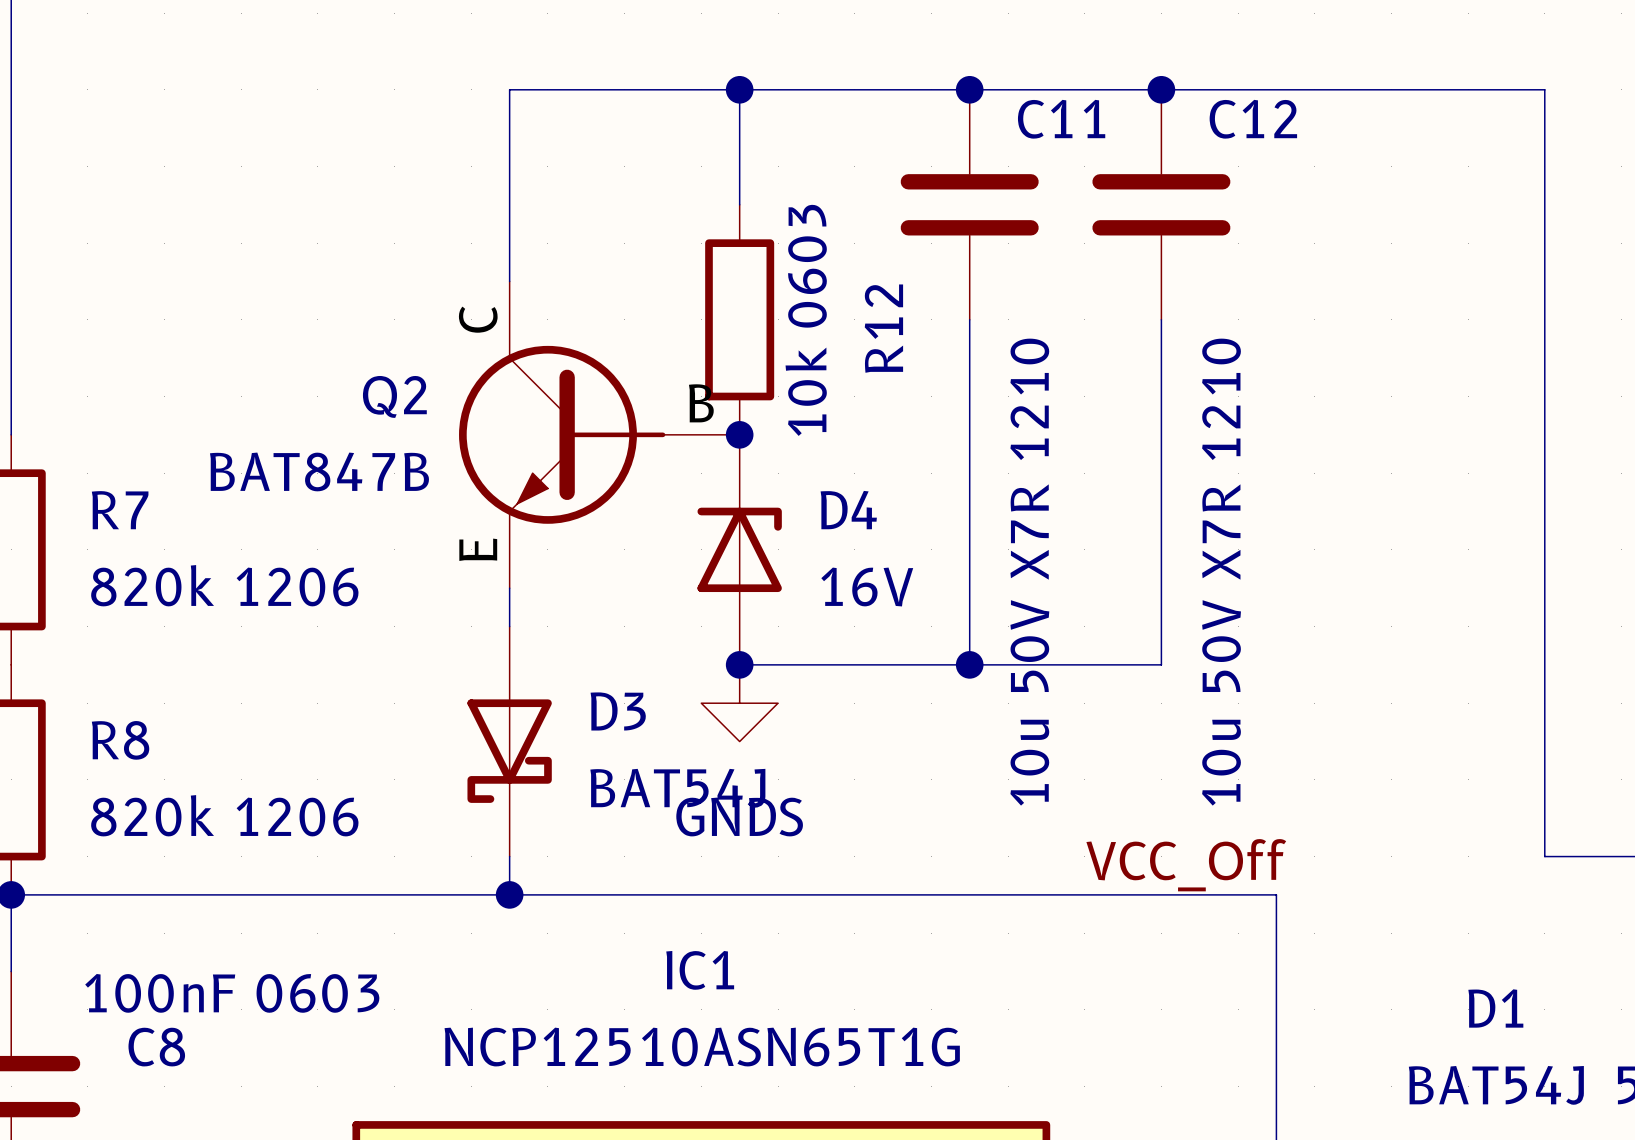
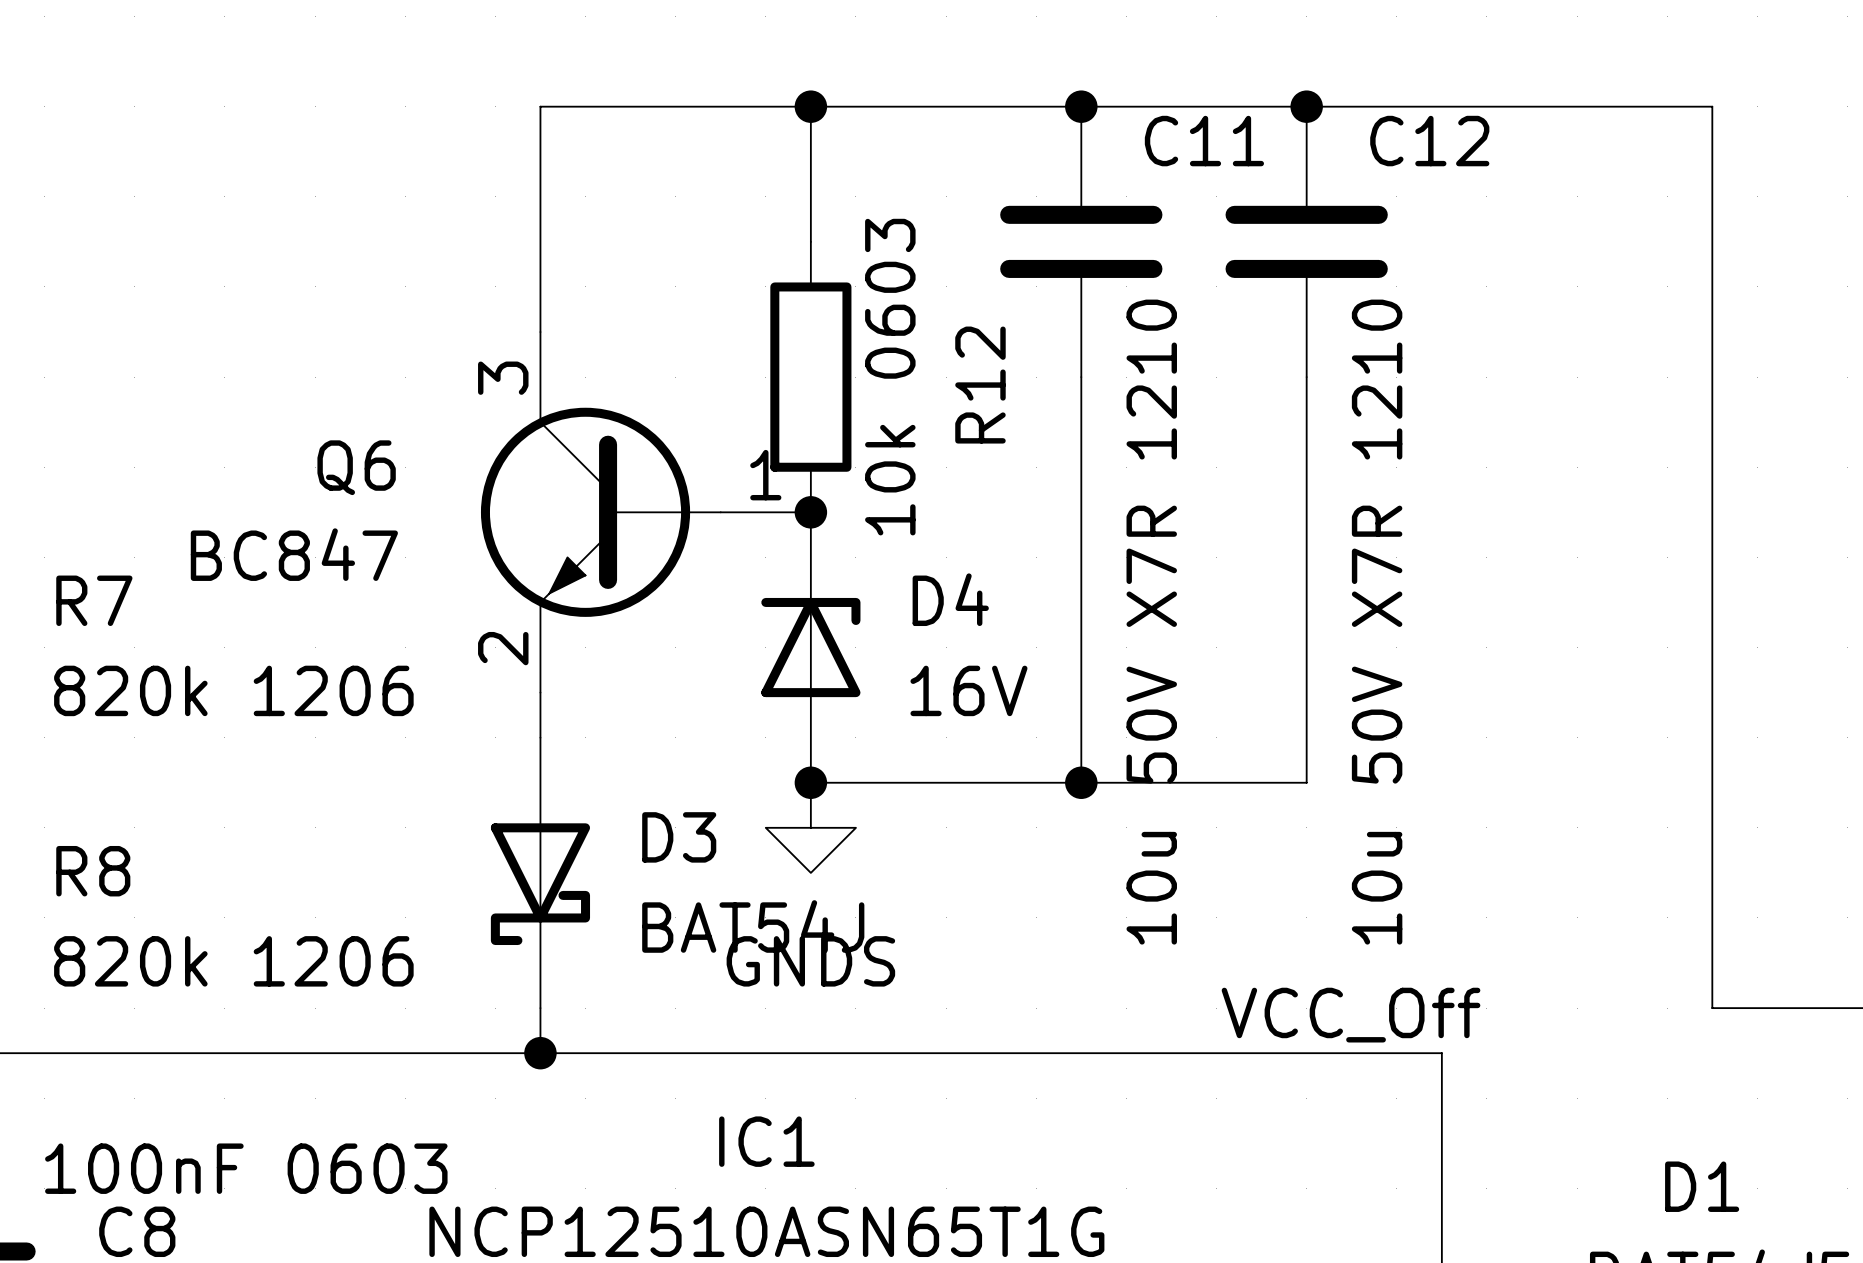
wire: (1506, 89) (1544, 89) (1544, 856) -> (1712, 106) (1712, 1008) (1757, 1008)
Q2: BAT847B (599, 434) -> none
Q6: none -> BC847 (645, 512)

